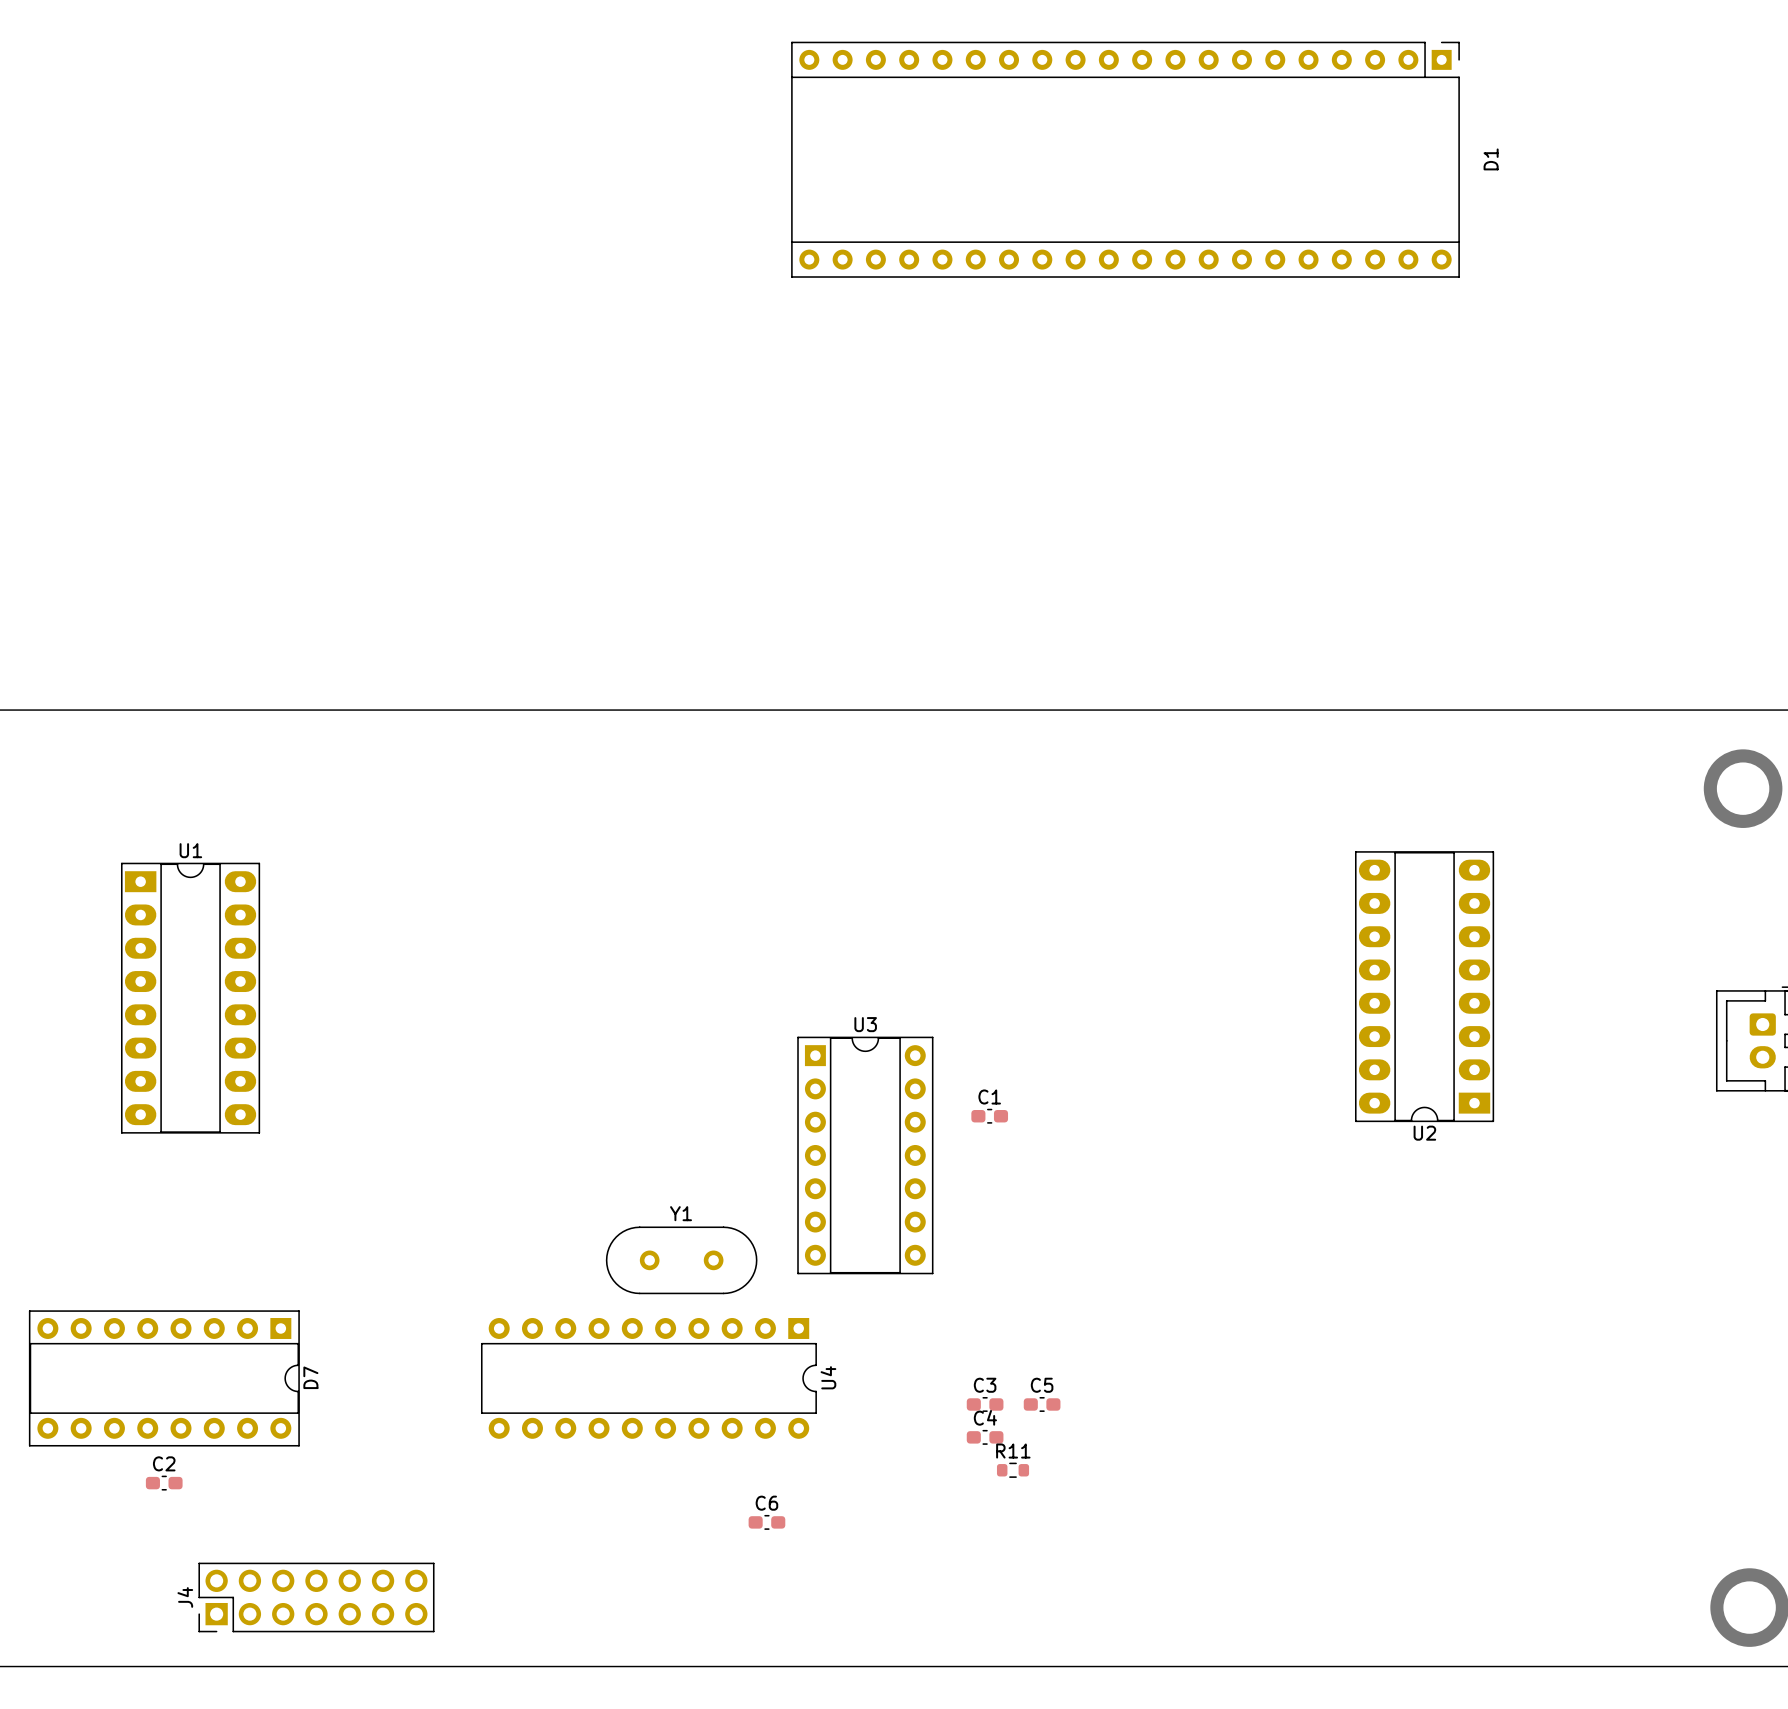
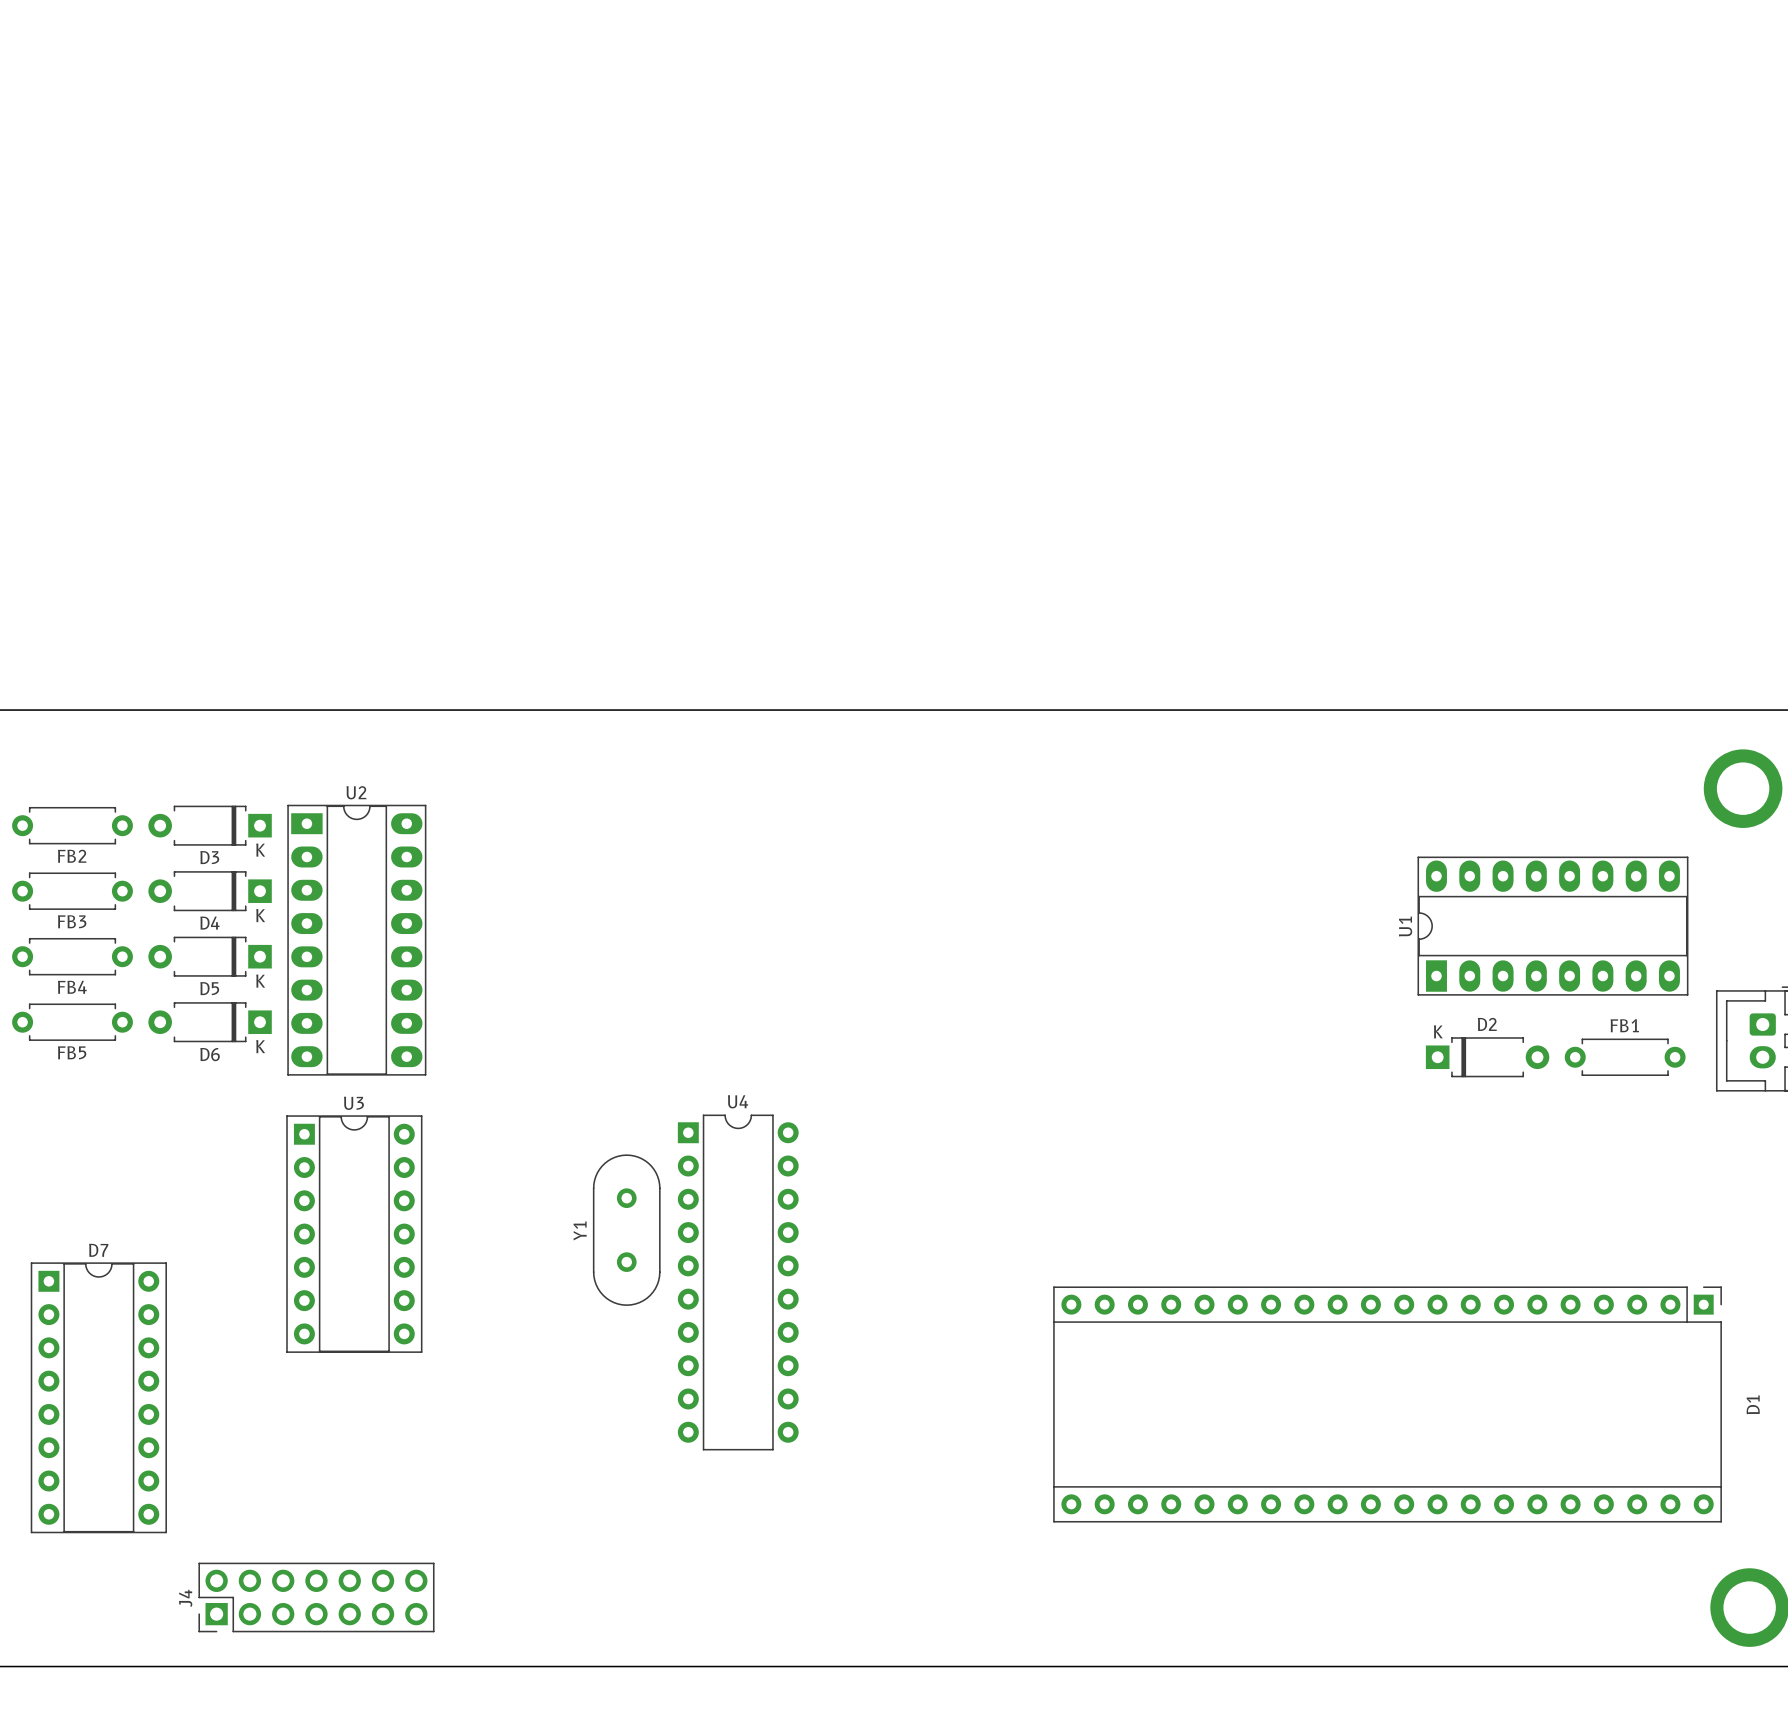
D1 position: (1125, 159) -> (1387, 1404)
FB2: none -> (72, 825)
D3: none -> (210, 825)
FB3: none -> (72, 891)
D4: none -> (210, 891)
FB4: none -> (72, 956)
D5: none -> (210, 956)
U2 rotation: 0° (1424, 986) -> 180° (356, 940)
U2 position: (1424, 986) -> (356, 940)
U1 rotation: 0° (190, 998) -> 90° counterclockwise (1552, 926)
U1 position: (190, 998) -> (1552, 926)
FB5: none -> (72, 1022)
D6: none -> (210, 1022)
D2: none -> (1487, 1057)
FB1: none -> (1625, 1057)
C1: (989, 1116) -> none
U3 position: (865, 1155) -> (354, 1234)
Y1 rotation: 0° (681, 1260) -> 90° counterclockwise (626, 1230)
D7 rotation: 0° (164, 1378) -> 90° counterclockwise (98, 1397)
U4 rotation: 0° (648, 1378) -> 90° counterclockwise (738, 1282)
C3: (985, 1404) -> none
C5: (1042, 1404) -> none
C4: (985, 1437) -> none
R11: (1013, 1470) -> none
C2: (164, 1483) -> none
C6: (766, 1522) -> none

